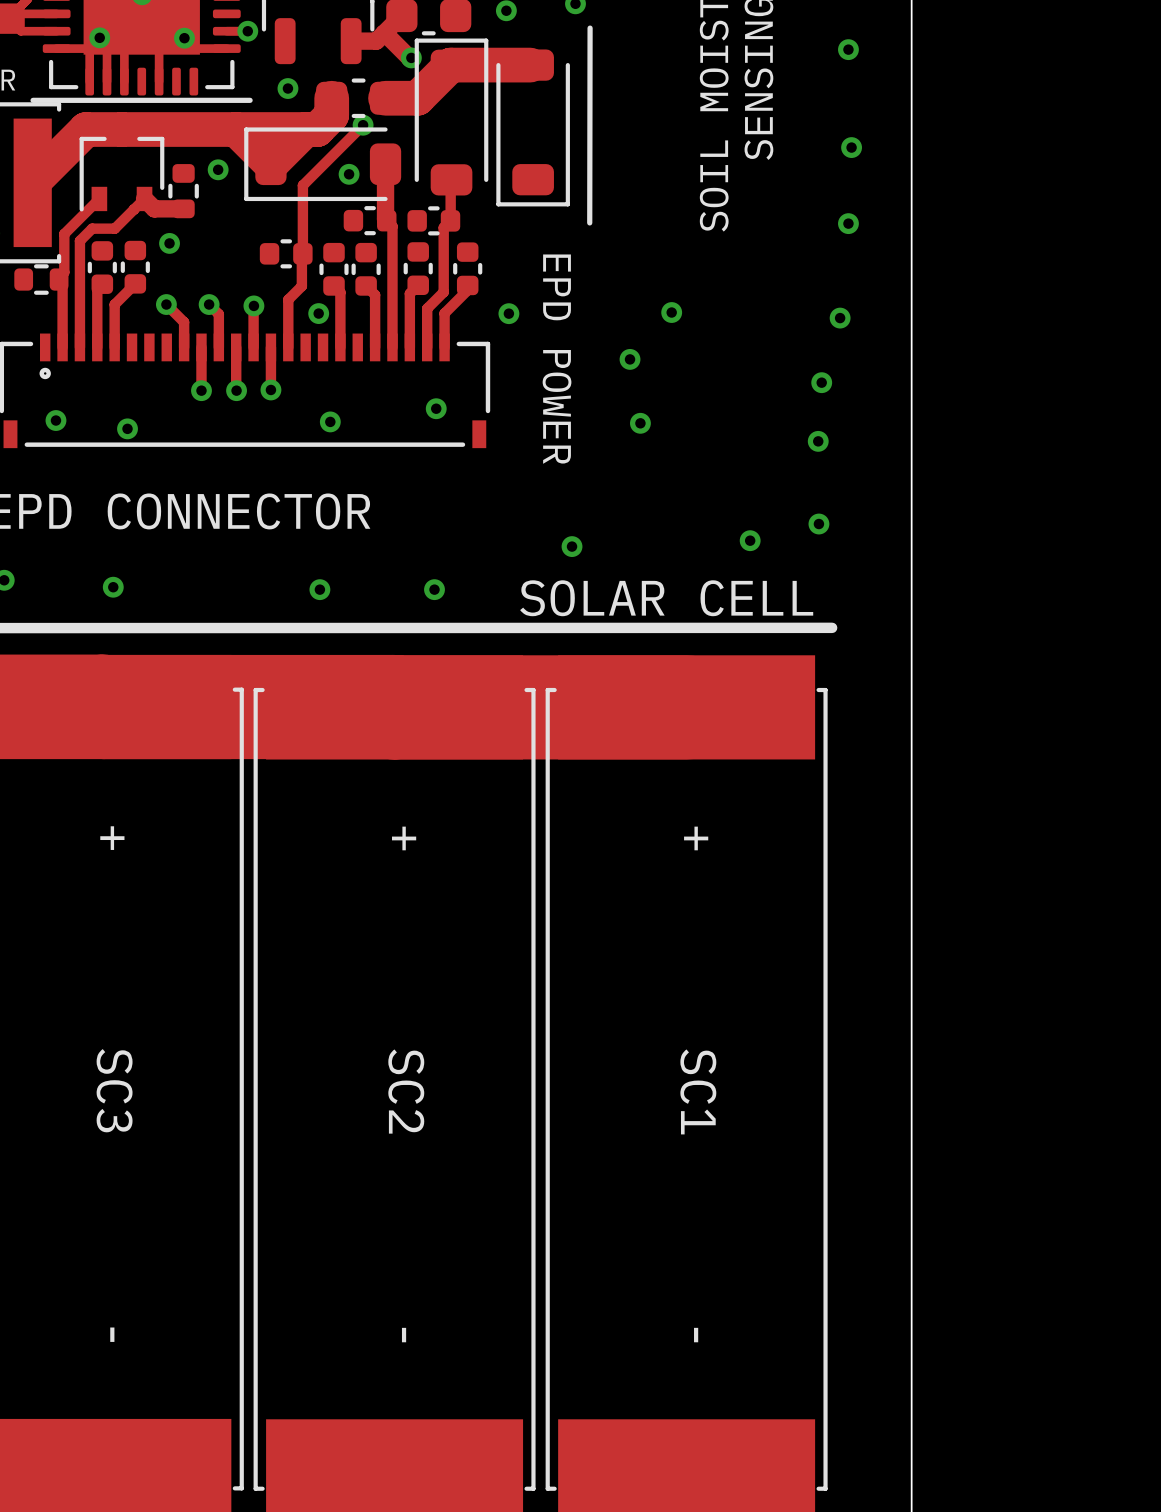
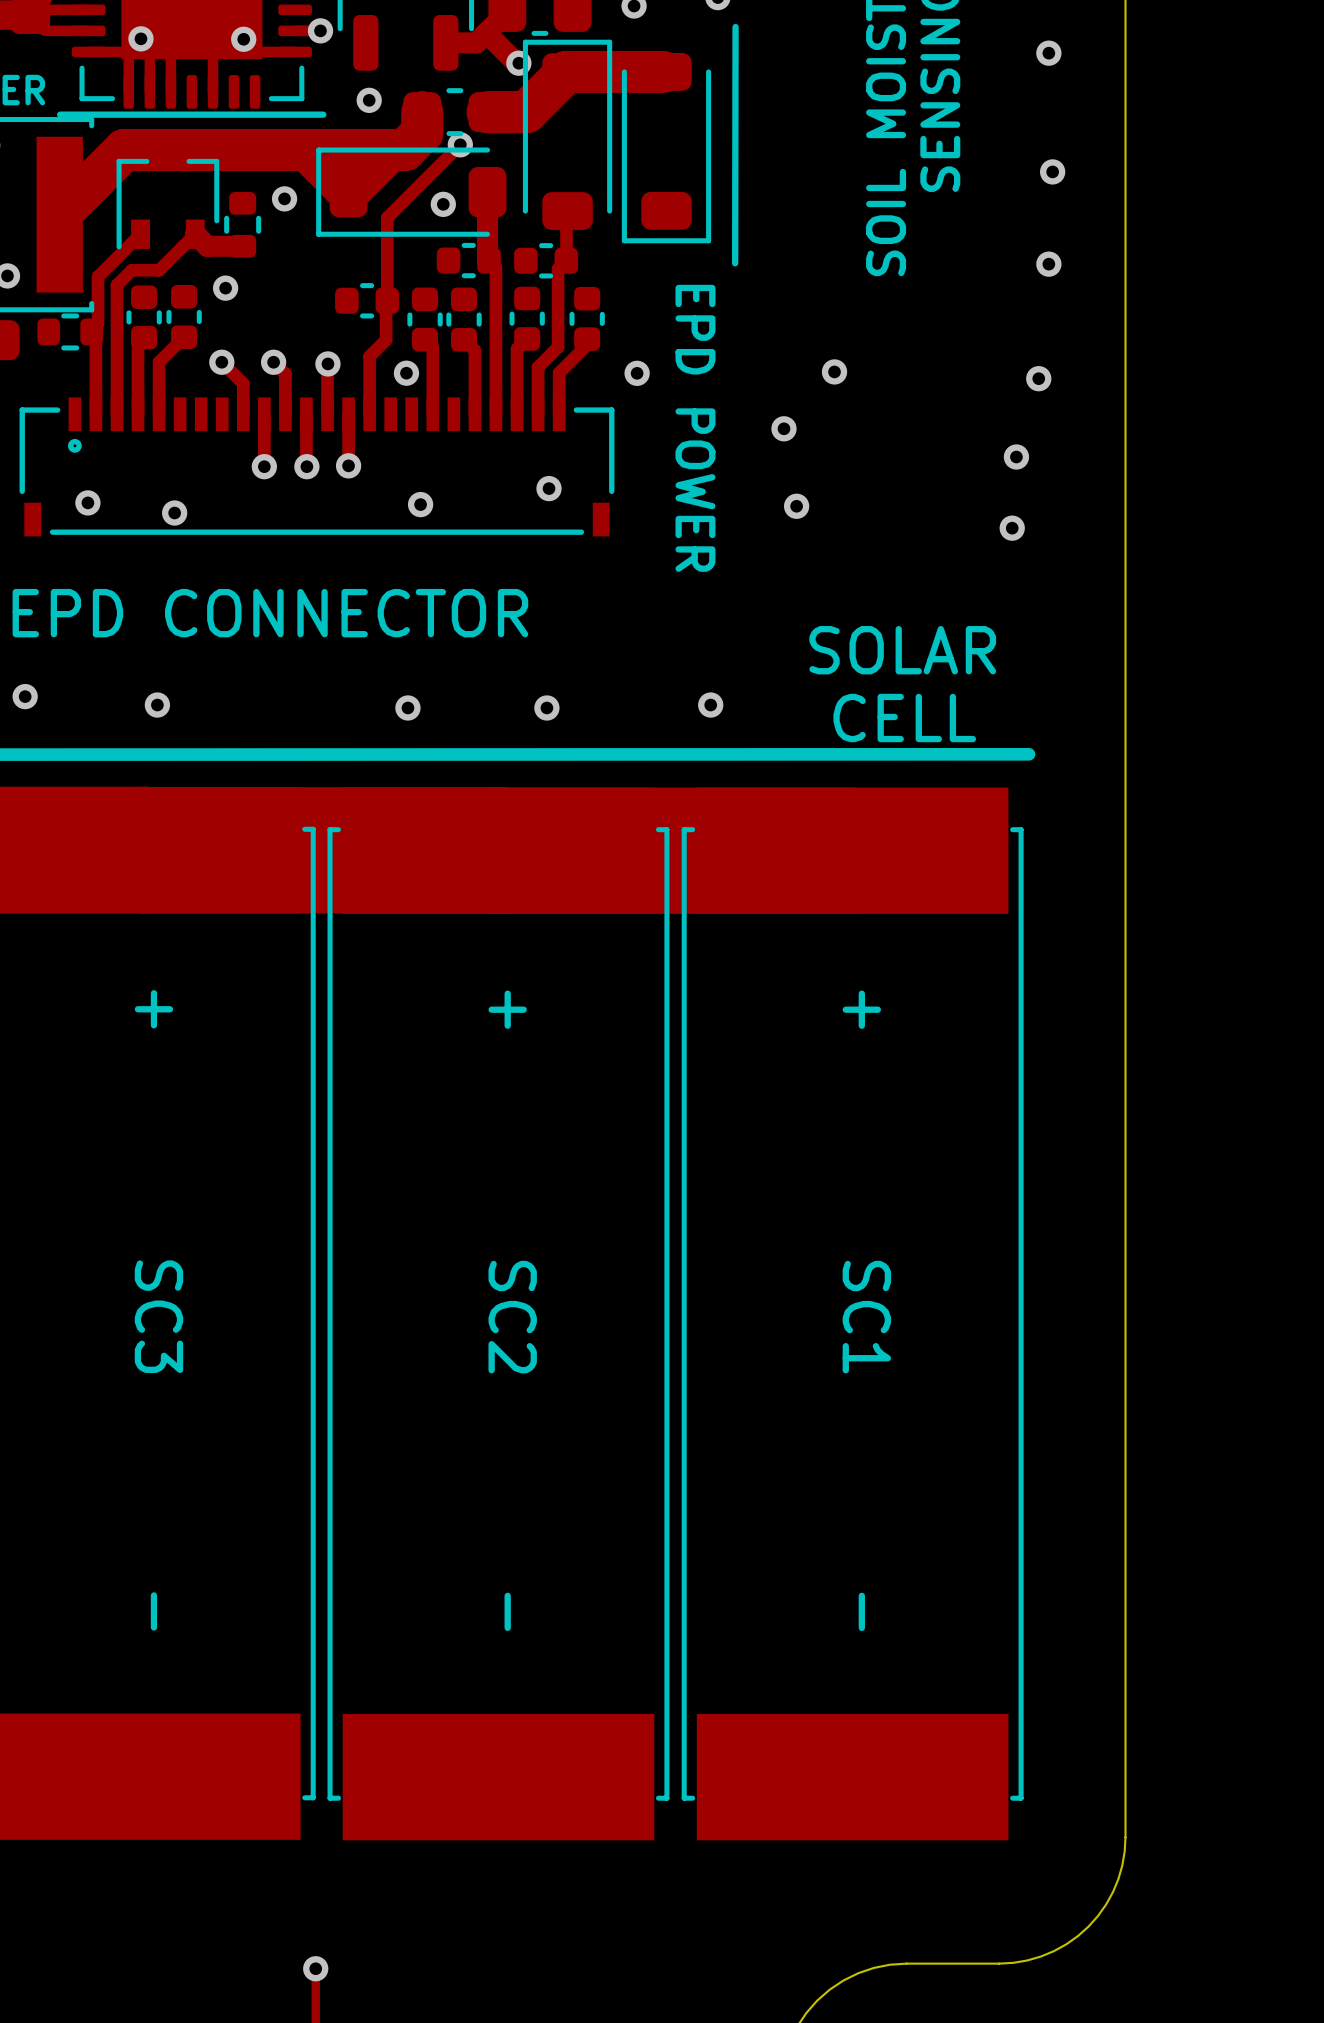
via: (818, 524) -> none
via: (750, 540) -> none
via position: (572, 546) -> (710, 705)
text: none -> CELL (904, 717)
text: SOLAR CELL (666, 598) -> SOLAR (902, 650)

